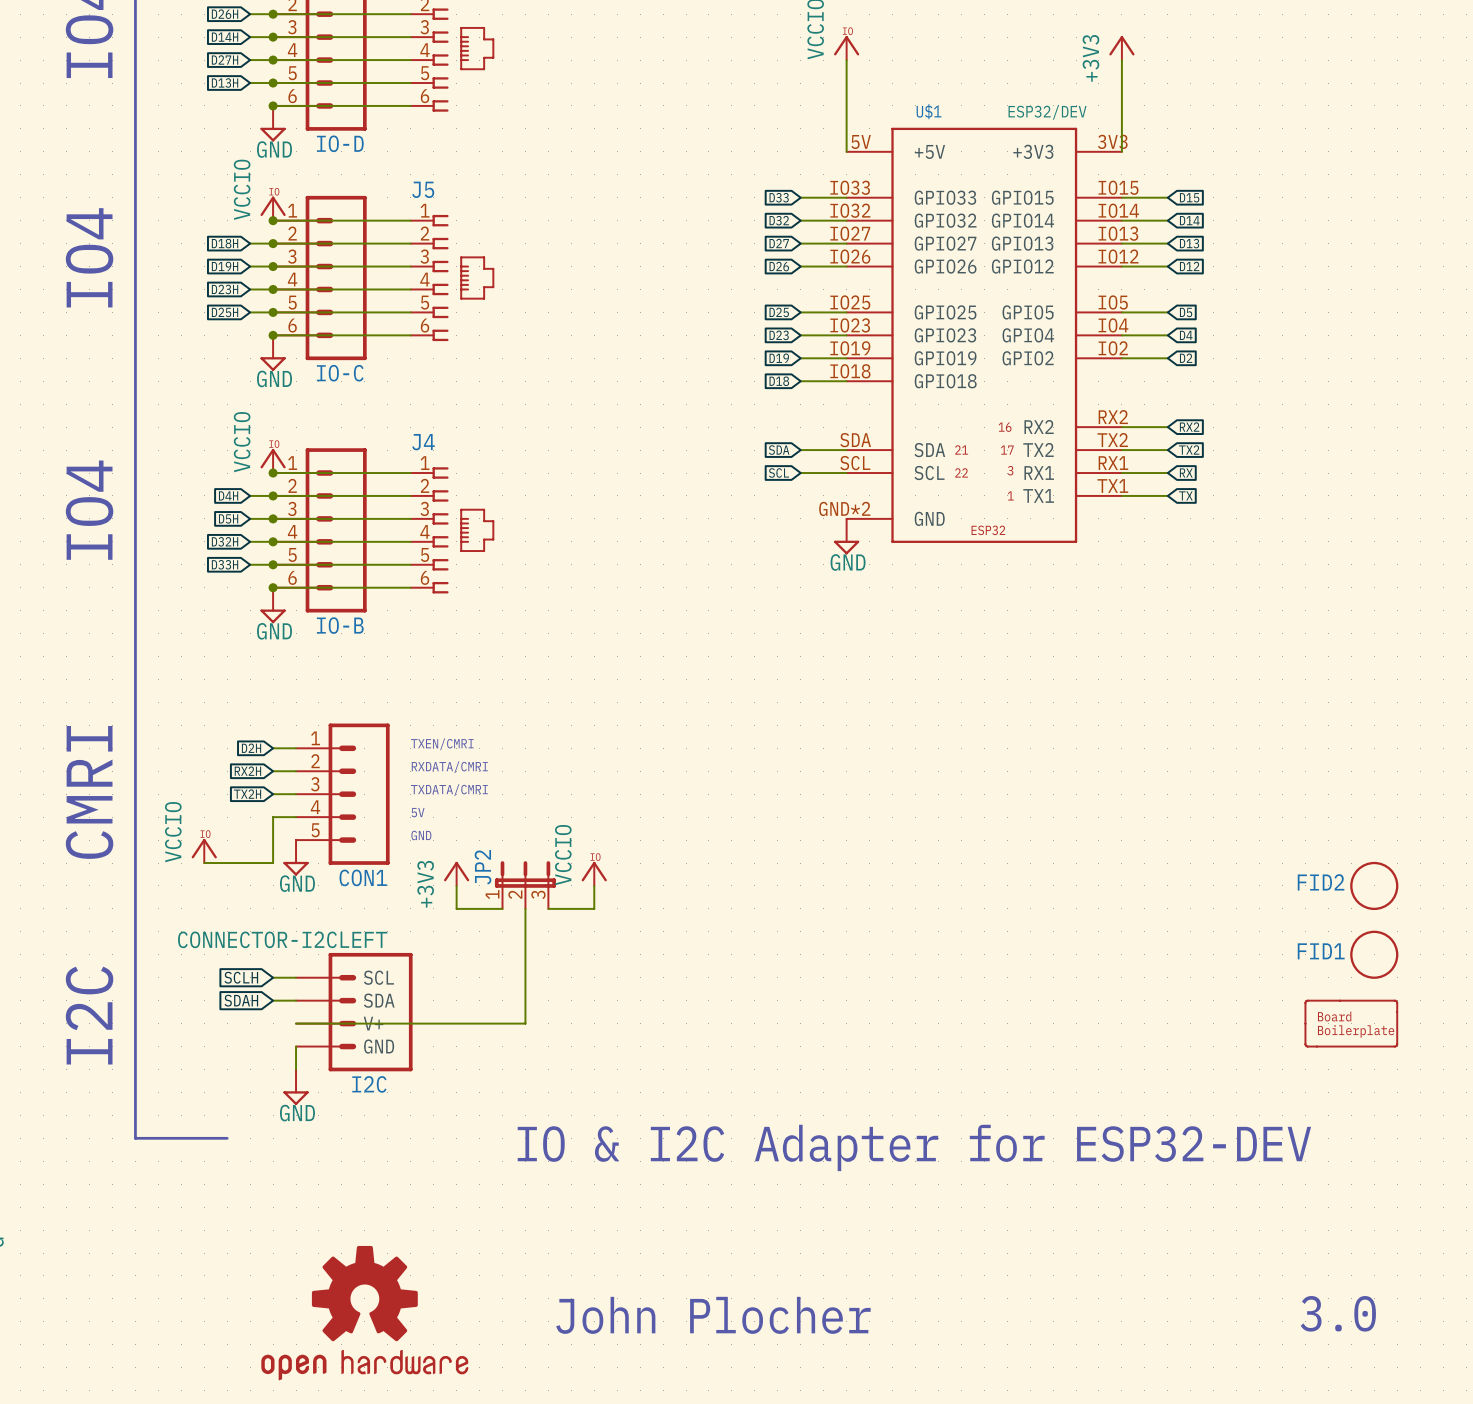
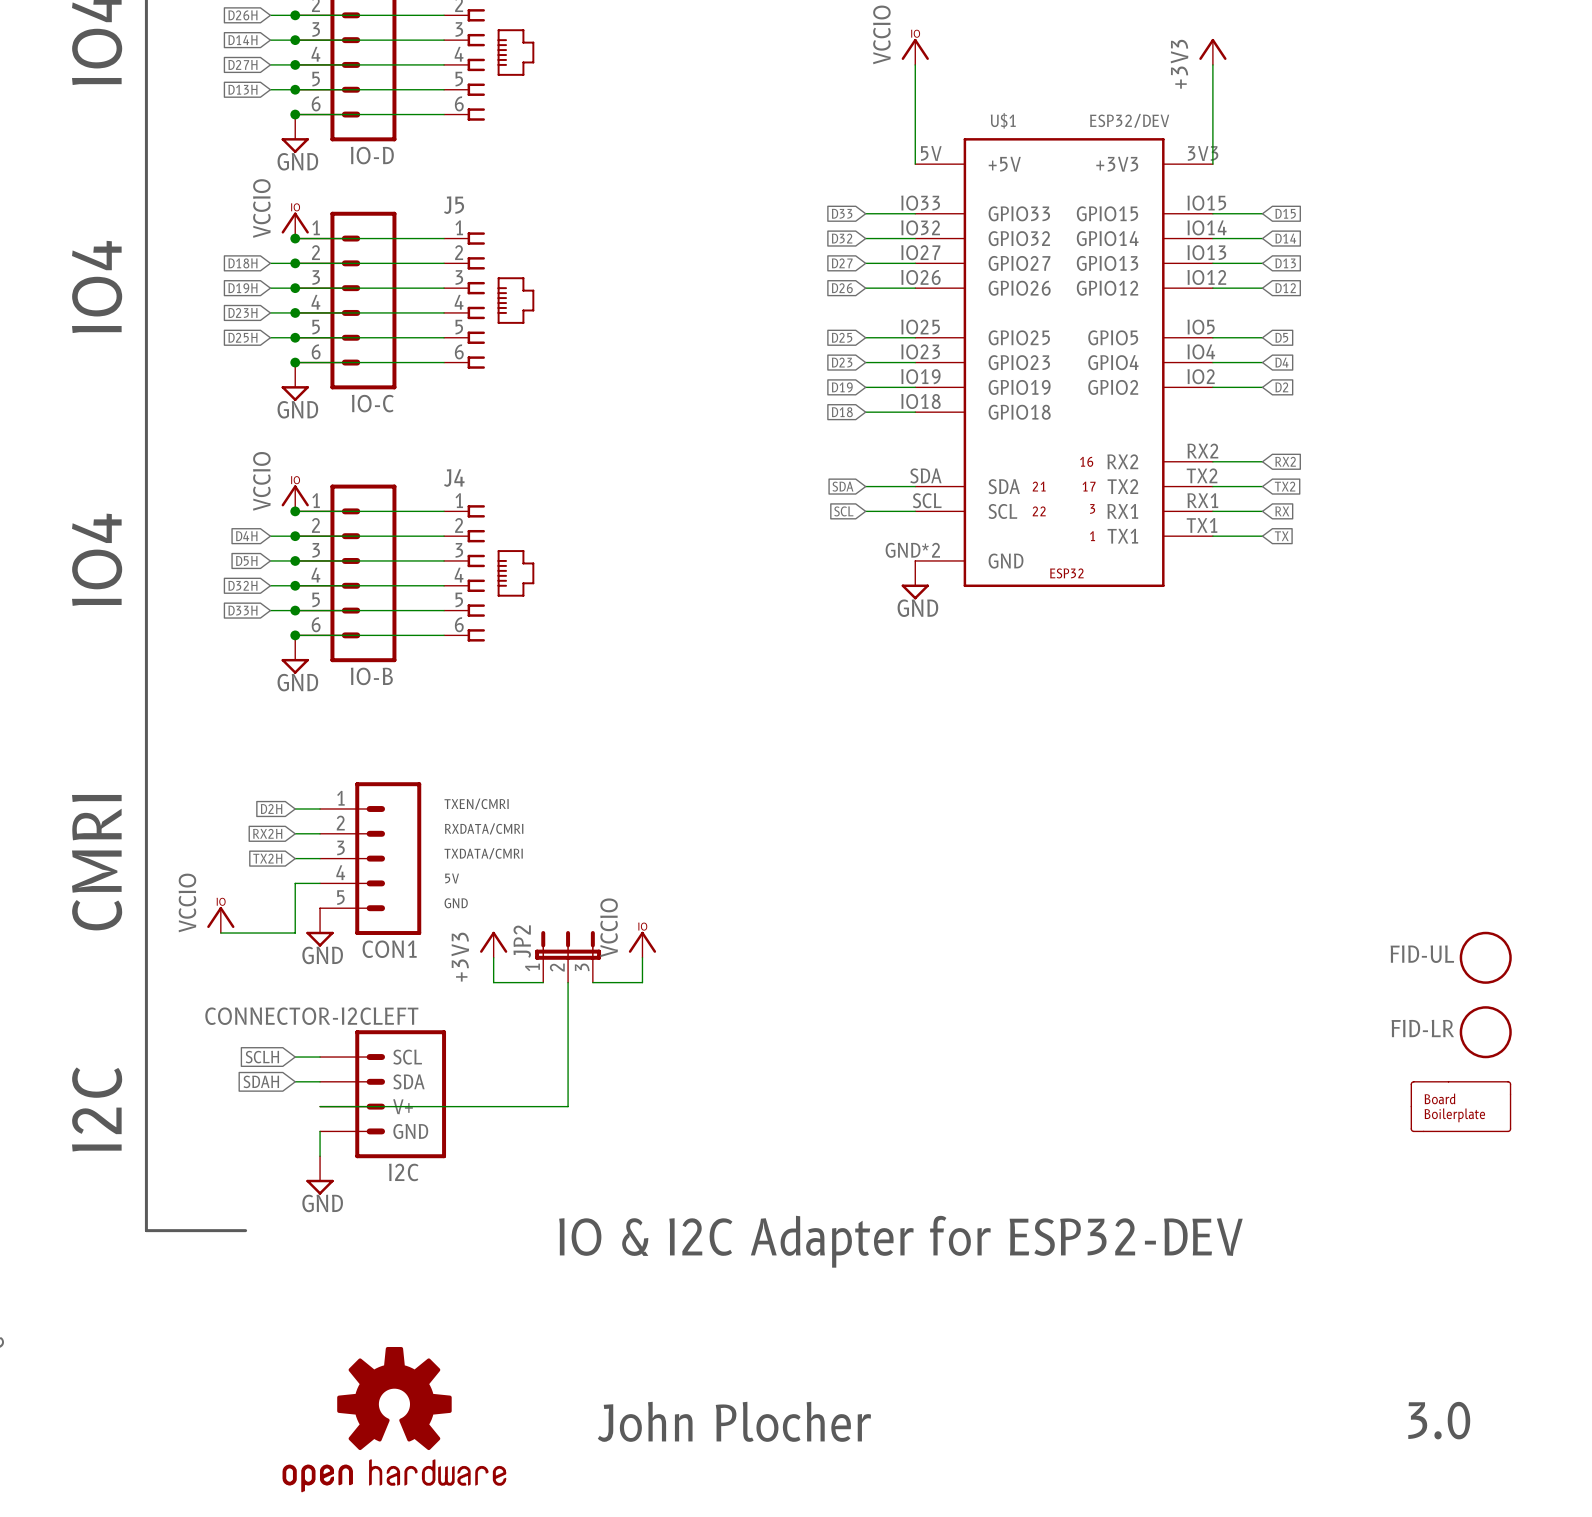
FID2 name: FID2 (1321, 882) -> FID-UL (1422, 954)
FID1 name: FID1 (1321, 951) -> FID-LR (1422, 1028)

